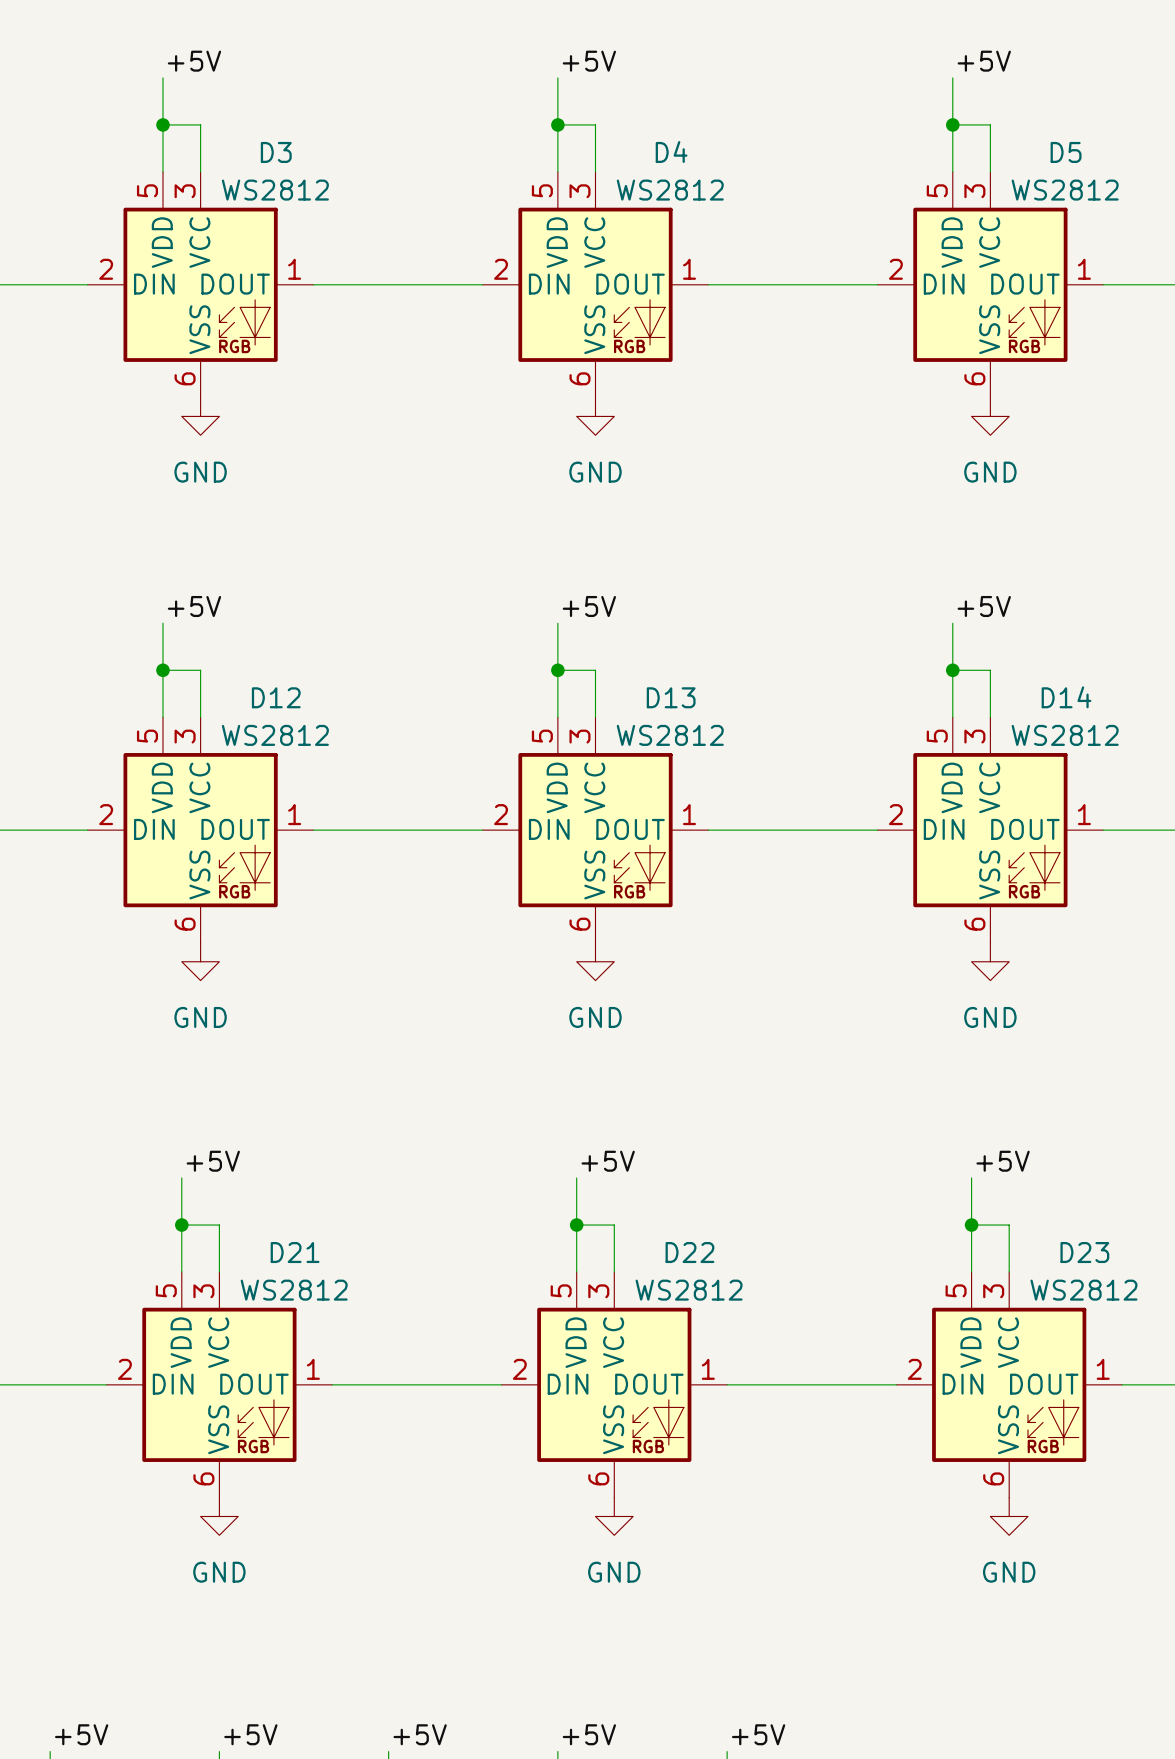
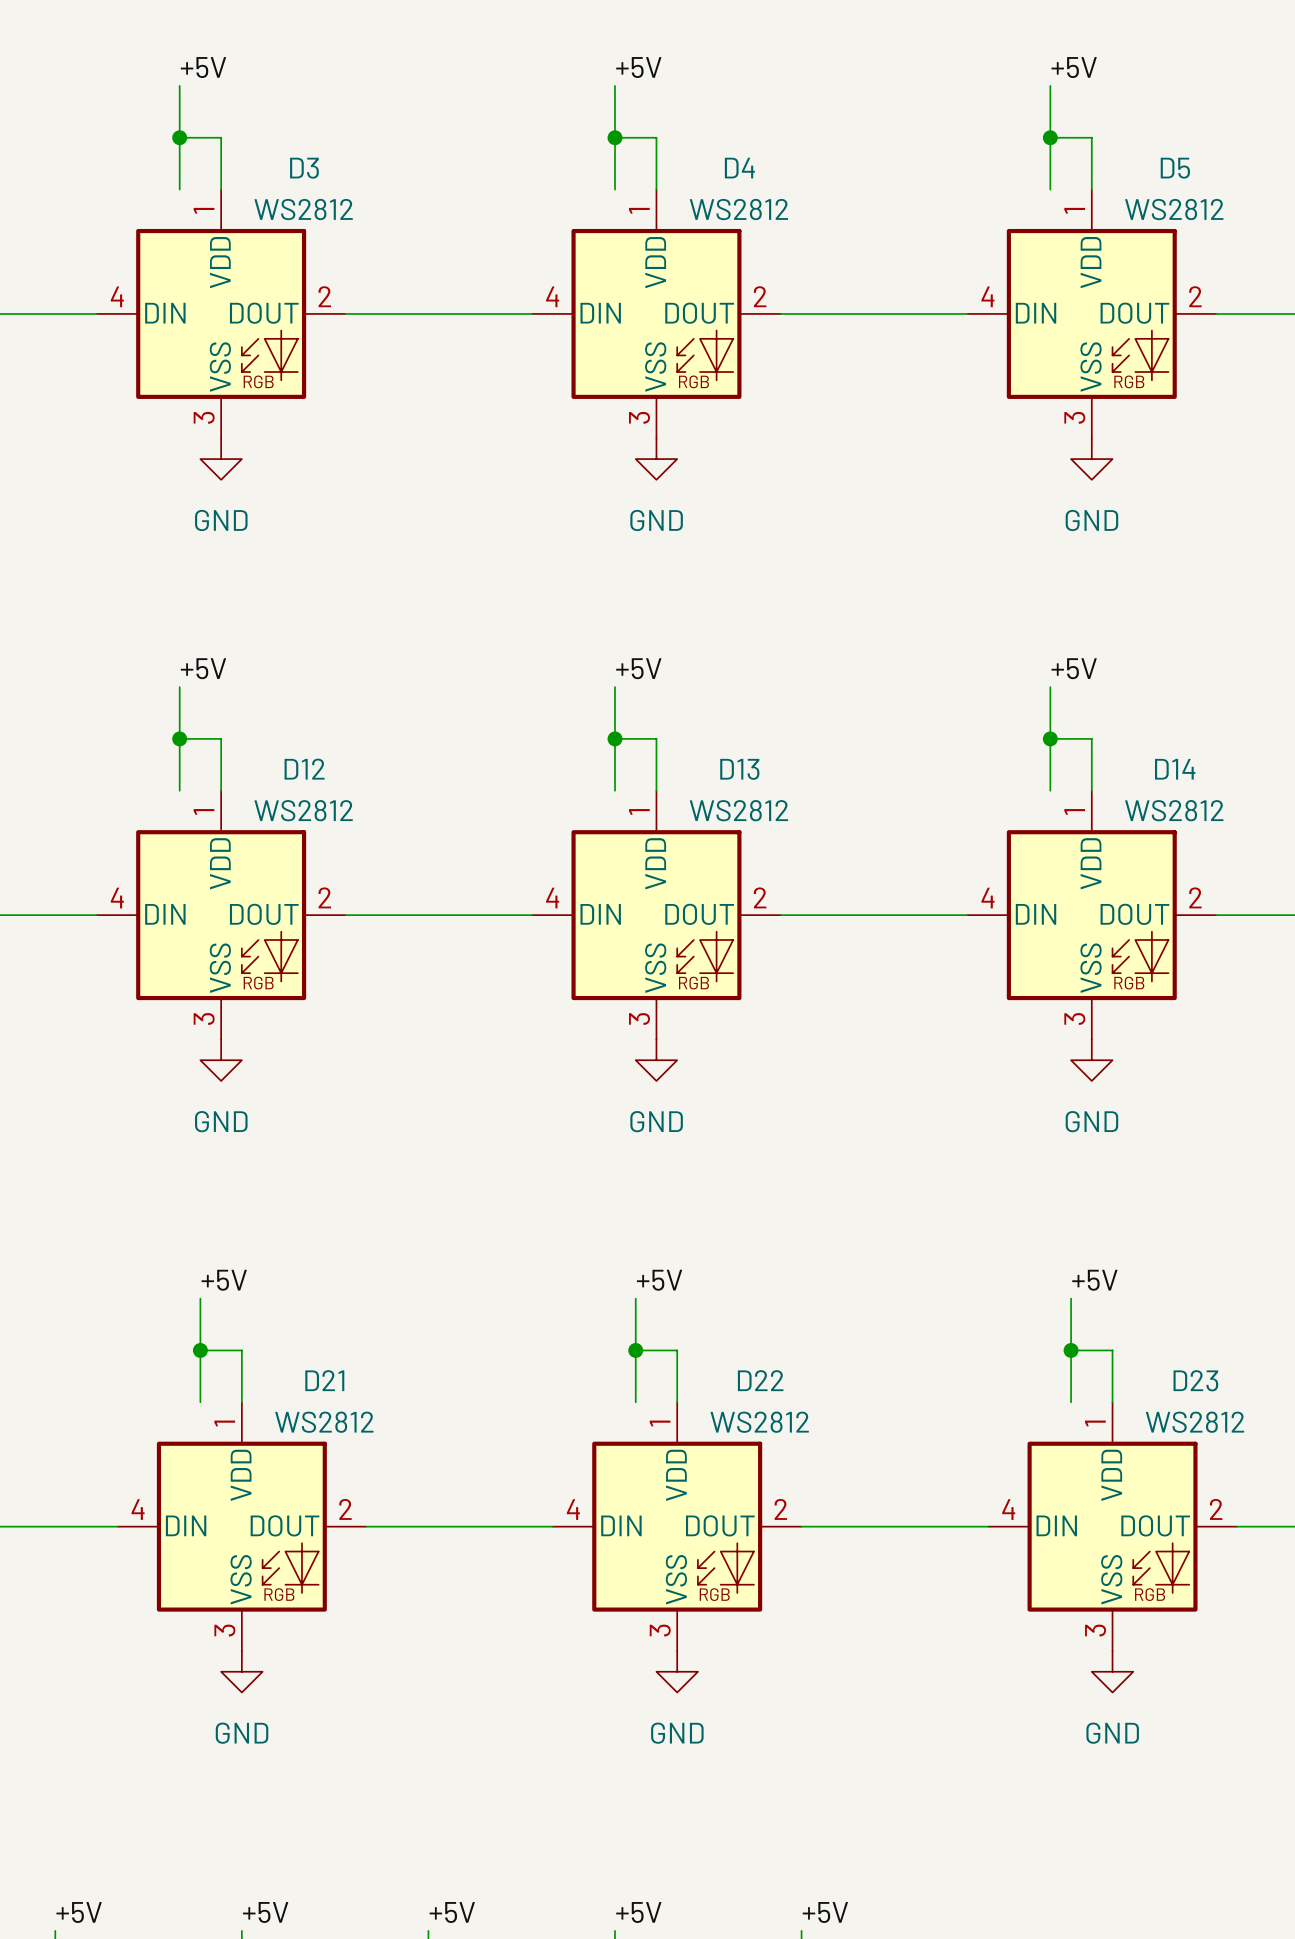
D3 symbol: [87, 171, 314, 398] -> [96, 189, 346, 439]
D4 symbol: [482, 171, 709, 398] -> [532, 189, 781, 439]
D5 symbol: [877, 171, 1104, 398] -> [967, 189, 1217, 439]
D12 symbol: [87, 717, 314, 943] -> [96, 790, 346, 1040]
D13 symbol: [482, 717, 709, 943] -> [532, 790, 781, 1040]
D14 symbol: [877, 717, 1104, 943] -> [967, 790, 1217, 1040]
D21 symbol: [106, 1272, 333, 1498] -> [117, 1402, 367, 1652]
D22 symbol: [501, 1272, 728, 1498] -> [552, 1402, 802, 1652]
D23 symbol: [896, 1272, 1123, 1498] -> [988, 1402, 1237, 1652]

